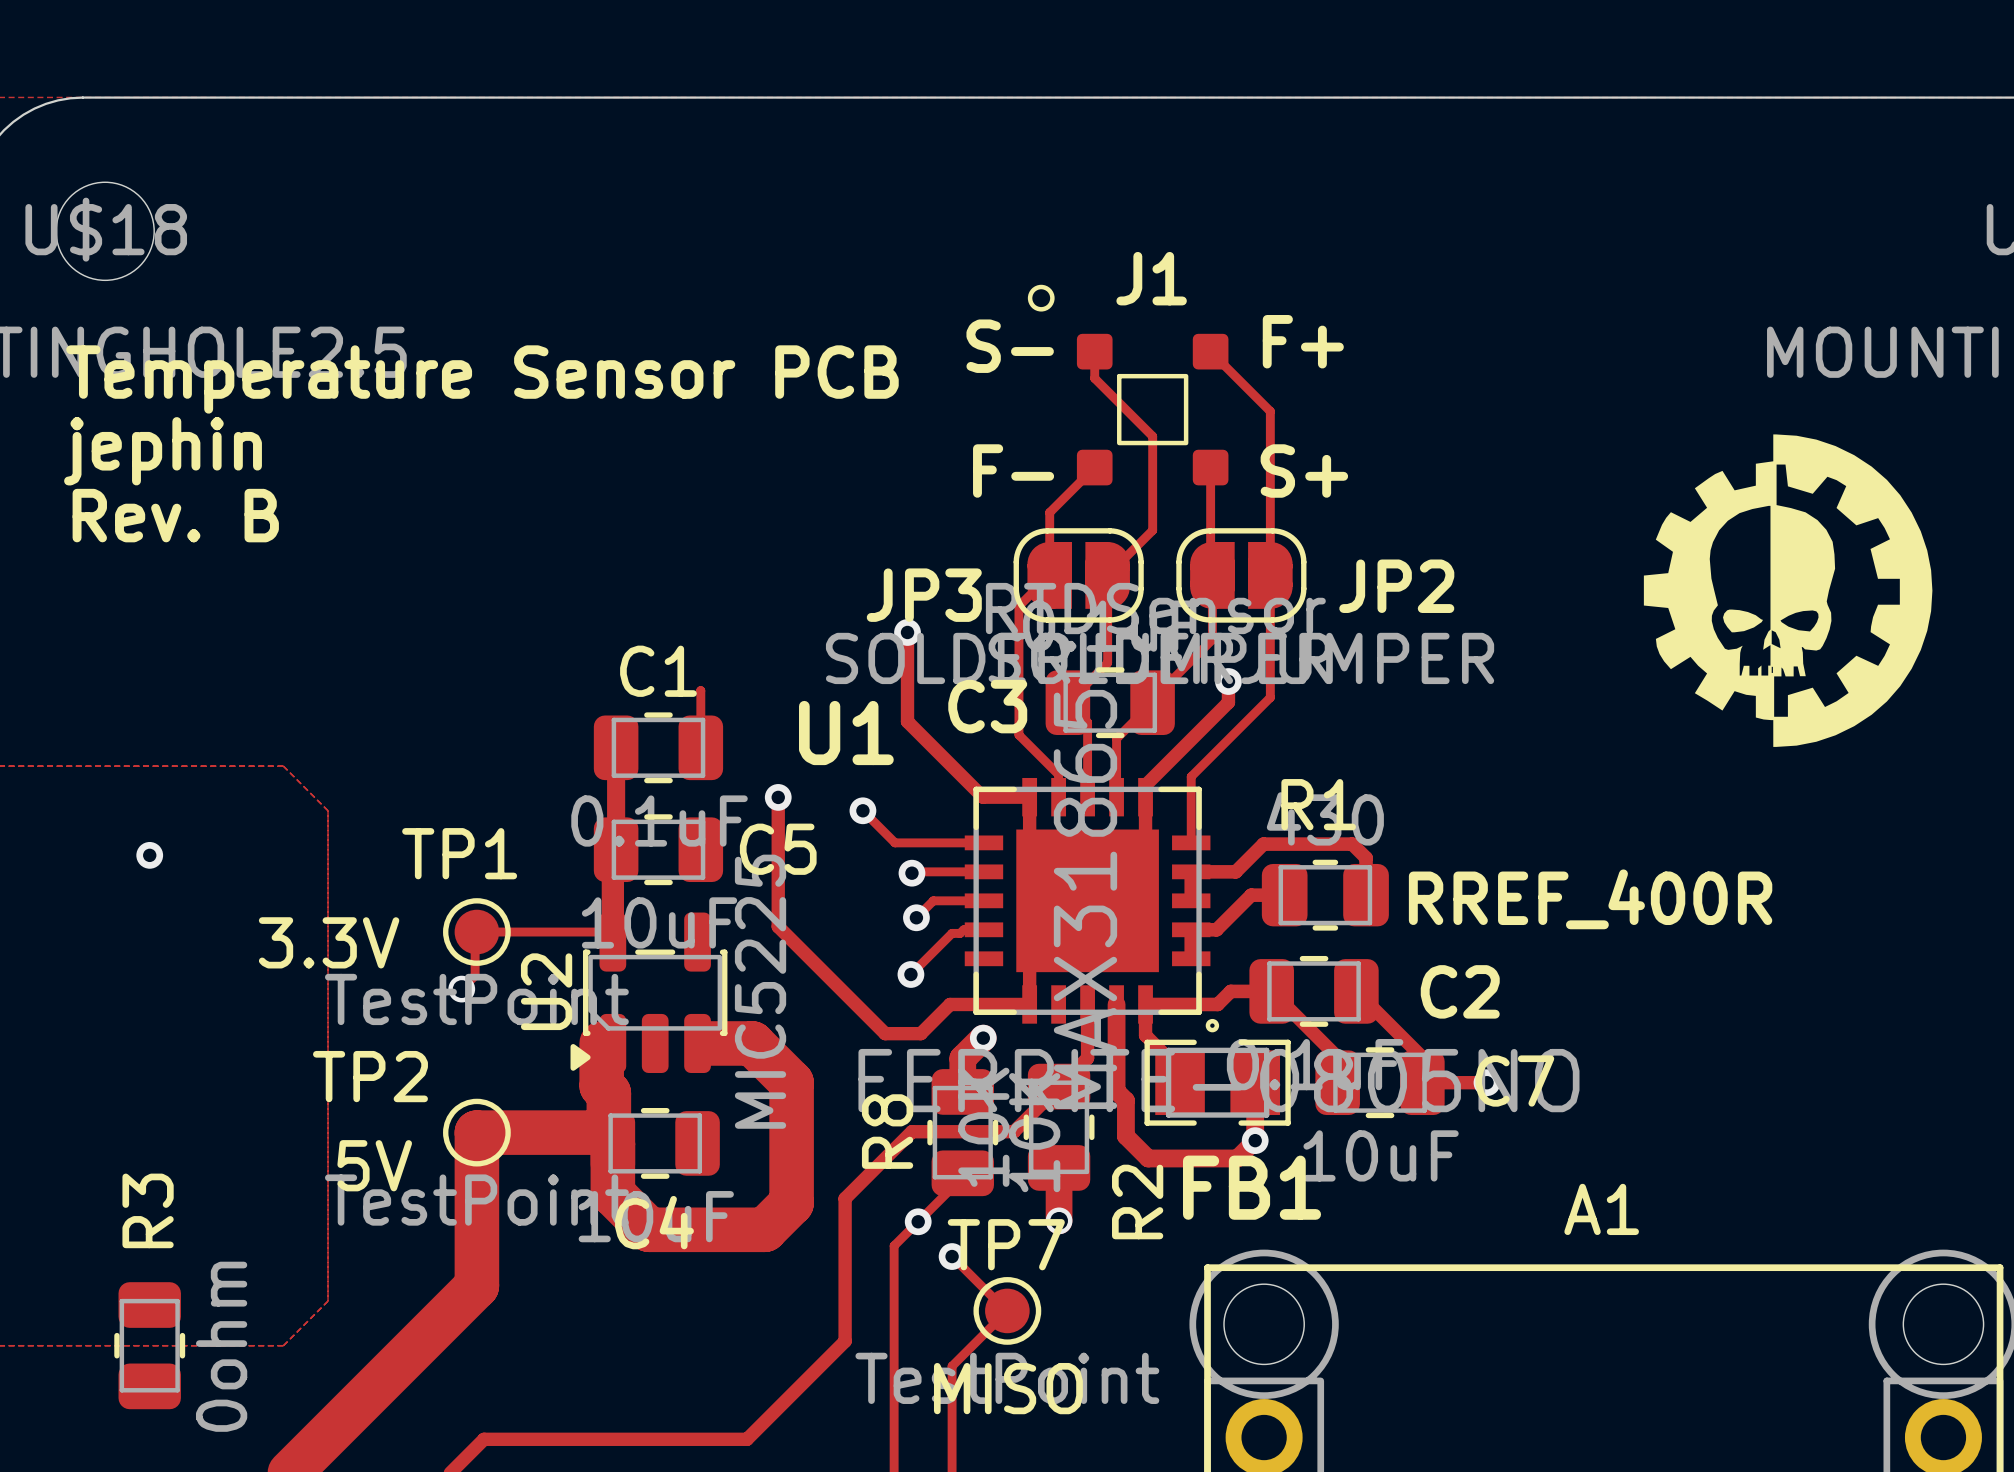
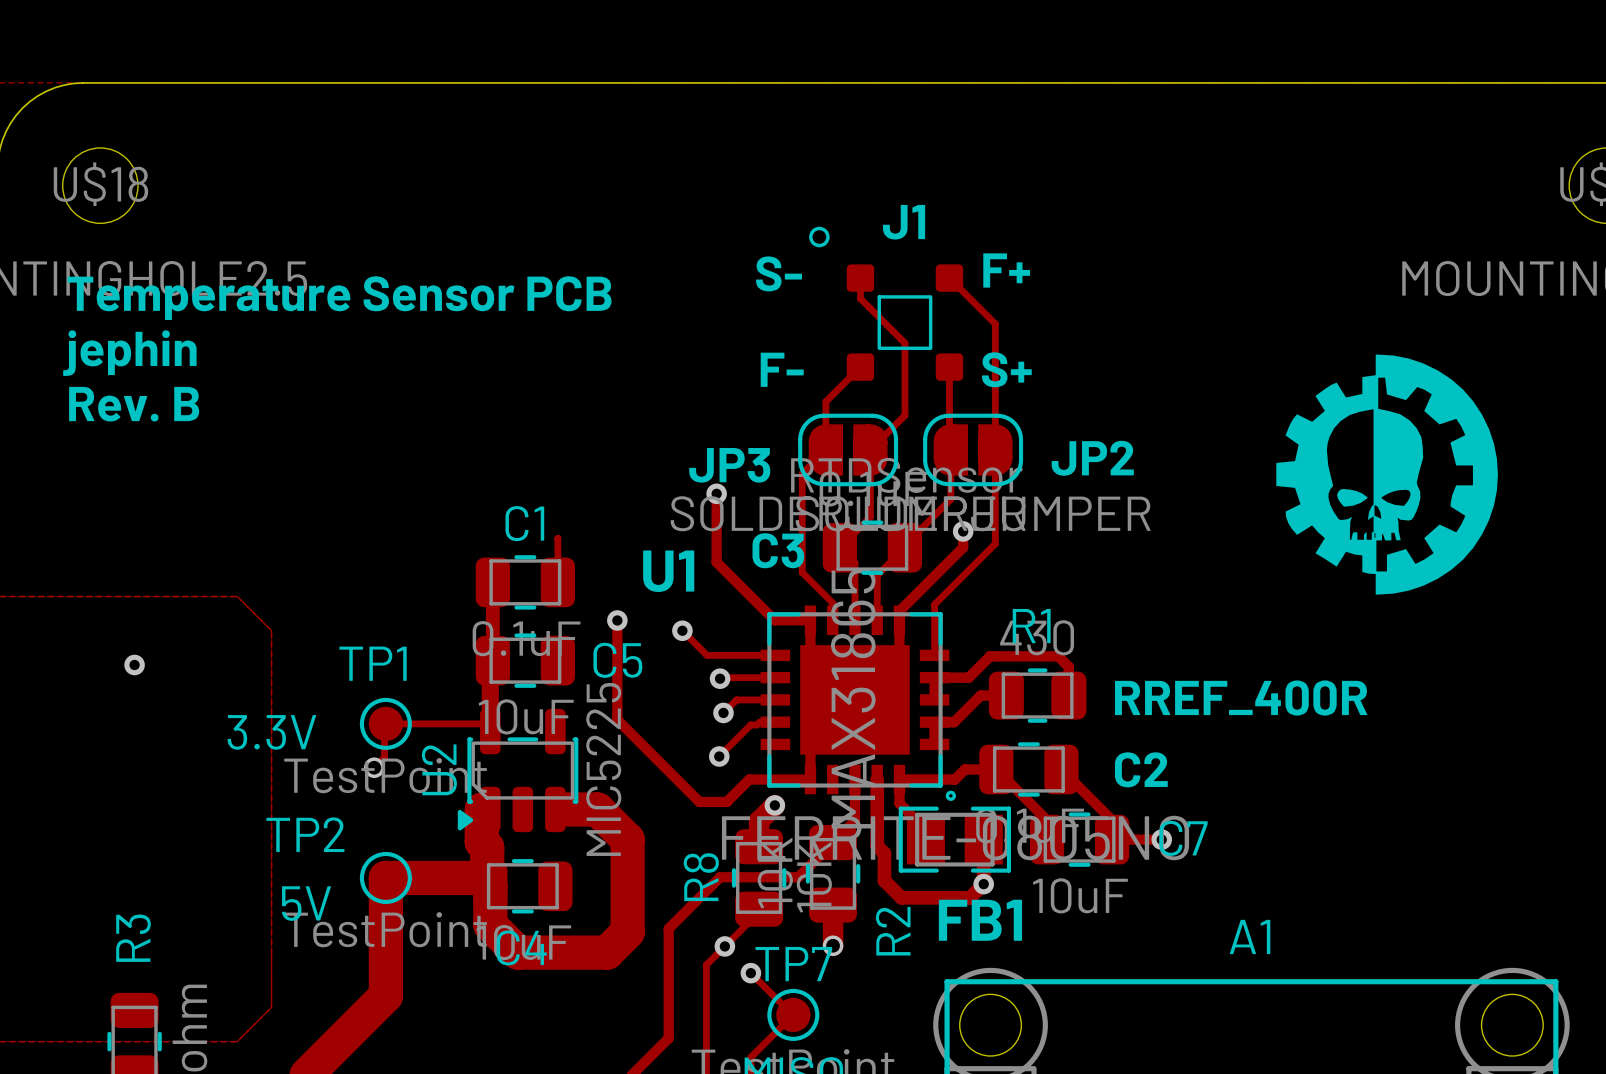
drawing position: (1788, 590) -> (1387, 474)
drawing position: (1742, 620) -> (1352, 497)

